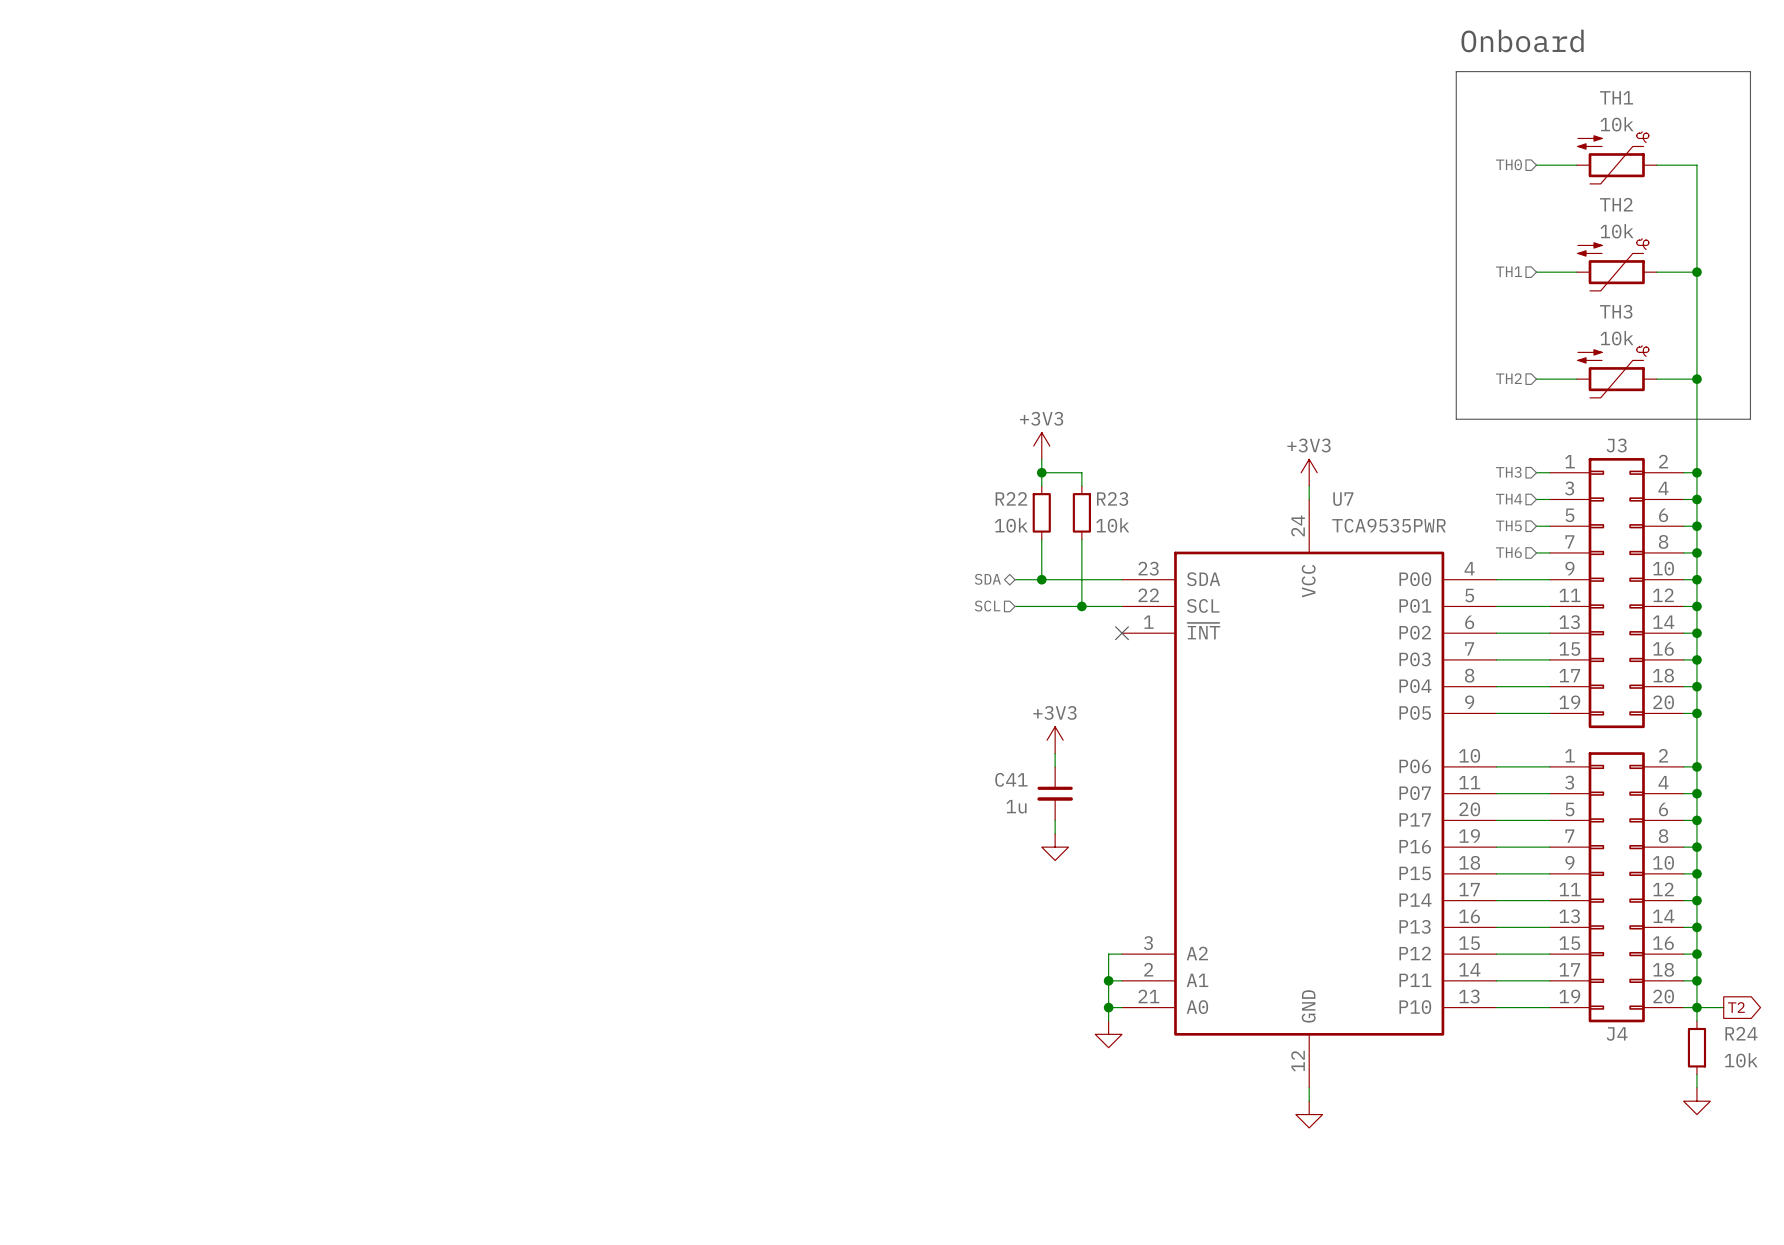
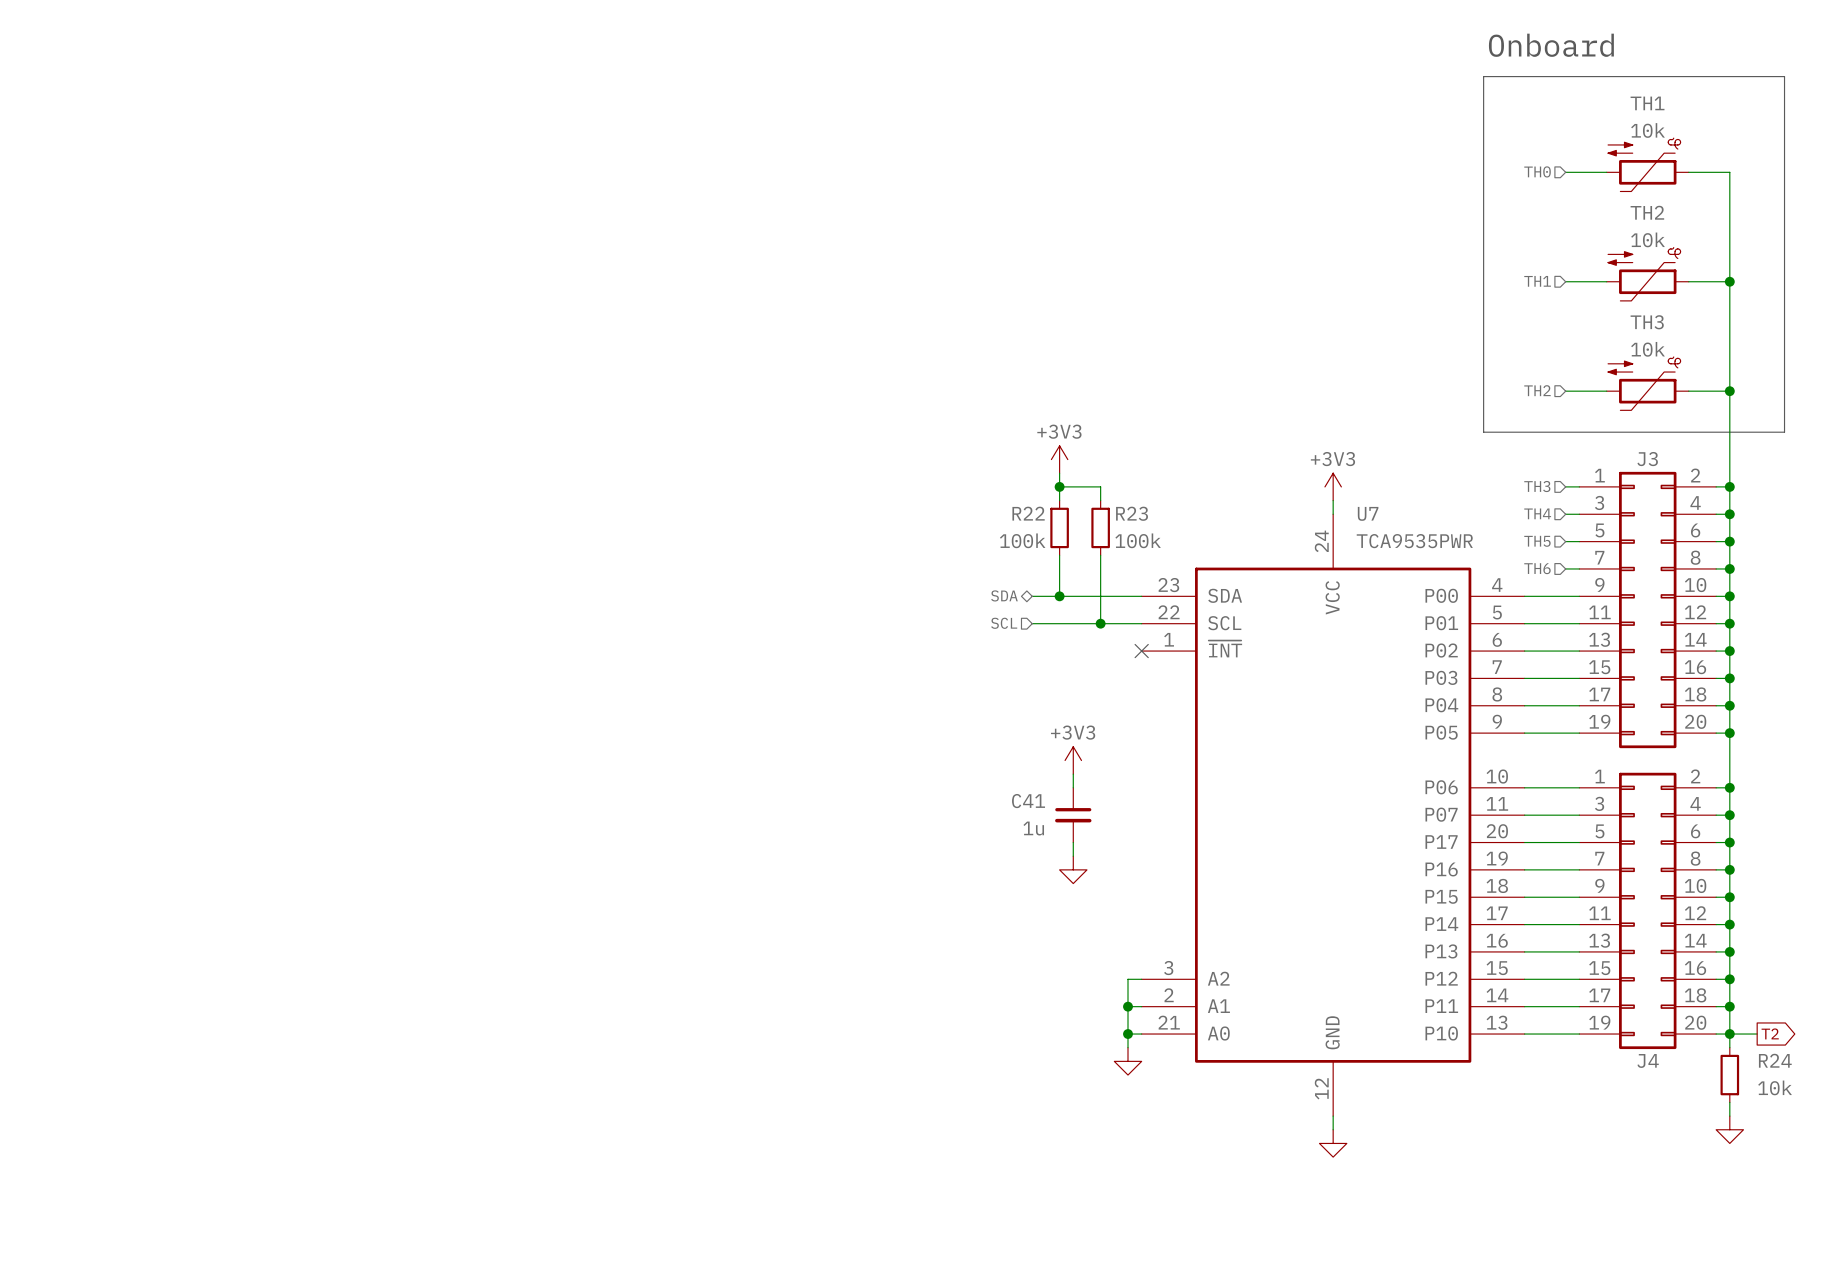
R22 value: 10k (1011, 525) -> 100k (1022, 540)
R23 value: 10k (1112, 525) -> 100k (1138, 540)

